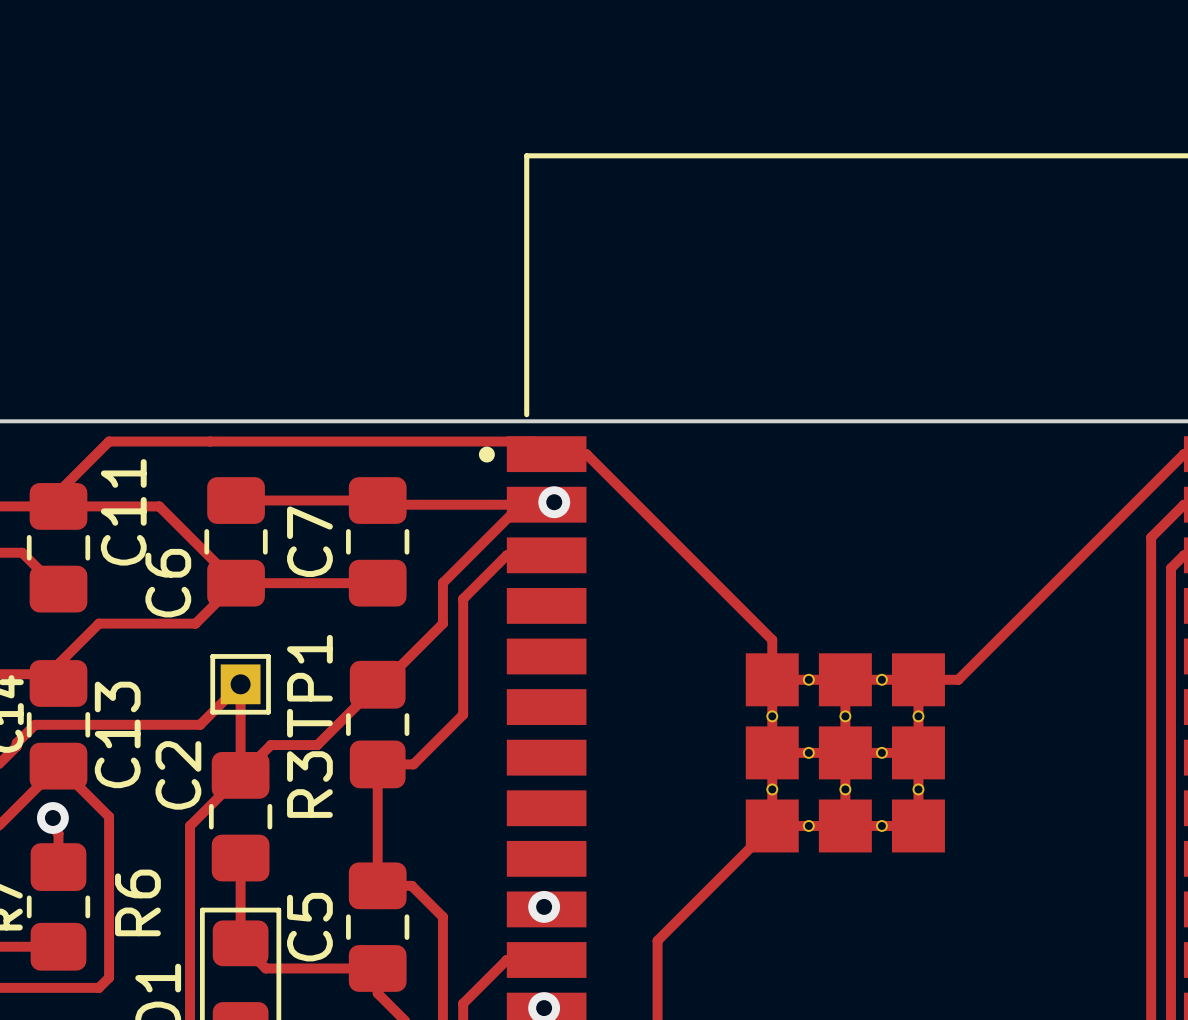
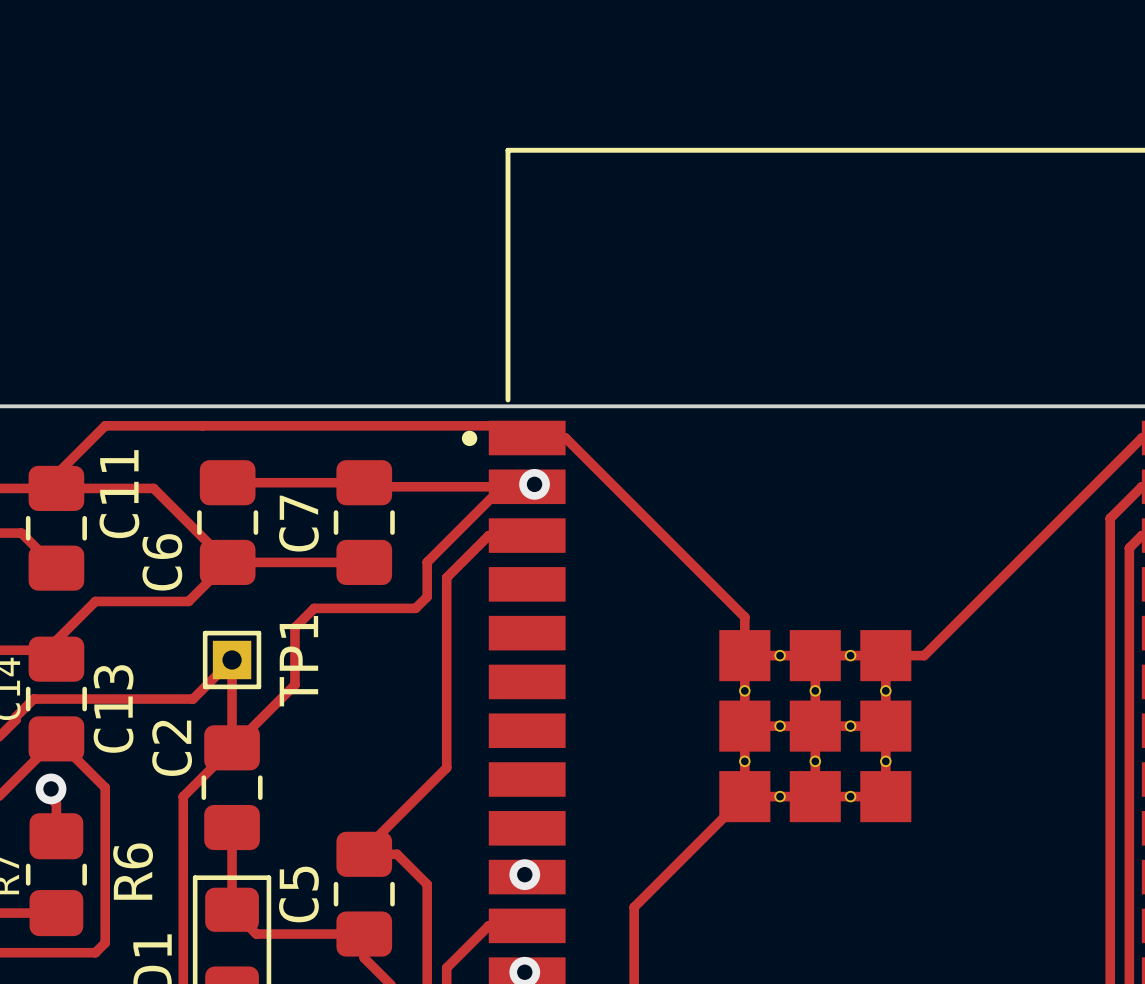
track: (442, 618) (442, 623) (317, 745) (270, 745) -> (427, 596) (415, 608) (314, 608) (294, 627) (294, 684) (261, 718)
track: (463, 714) (413, 764) (377, 764) (377, 881) -> (446, 689) (446, 767) (364, 850)
R3: (377, 724) -> none

